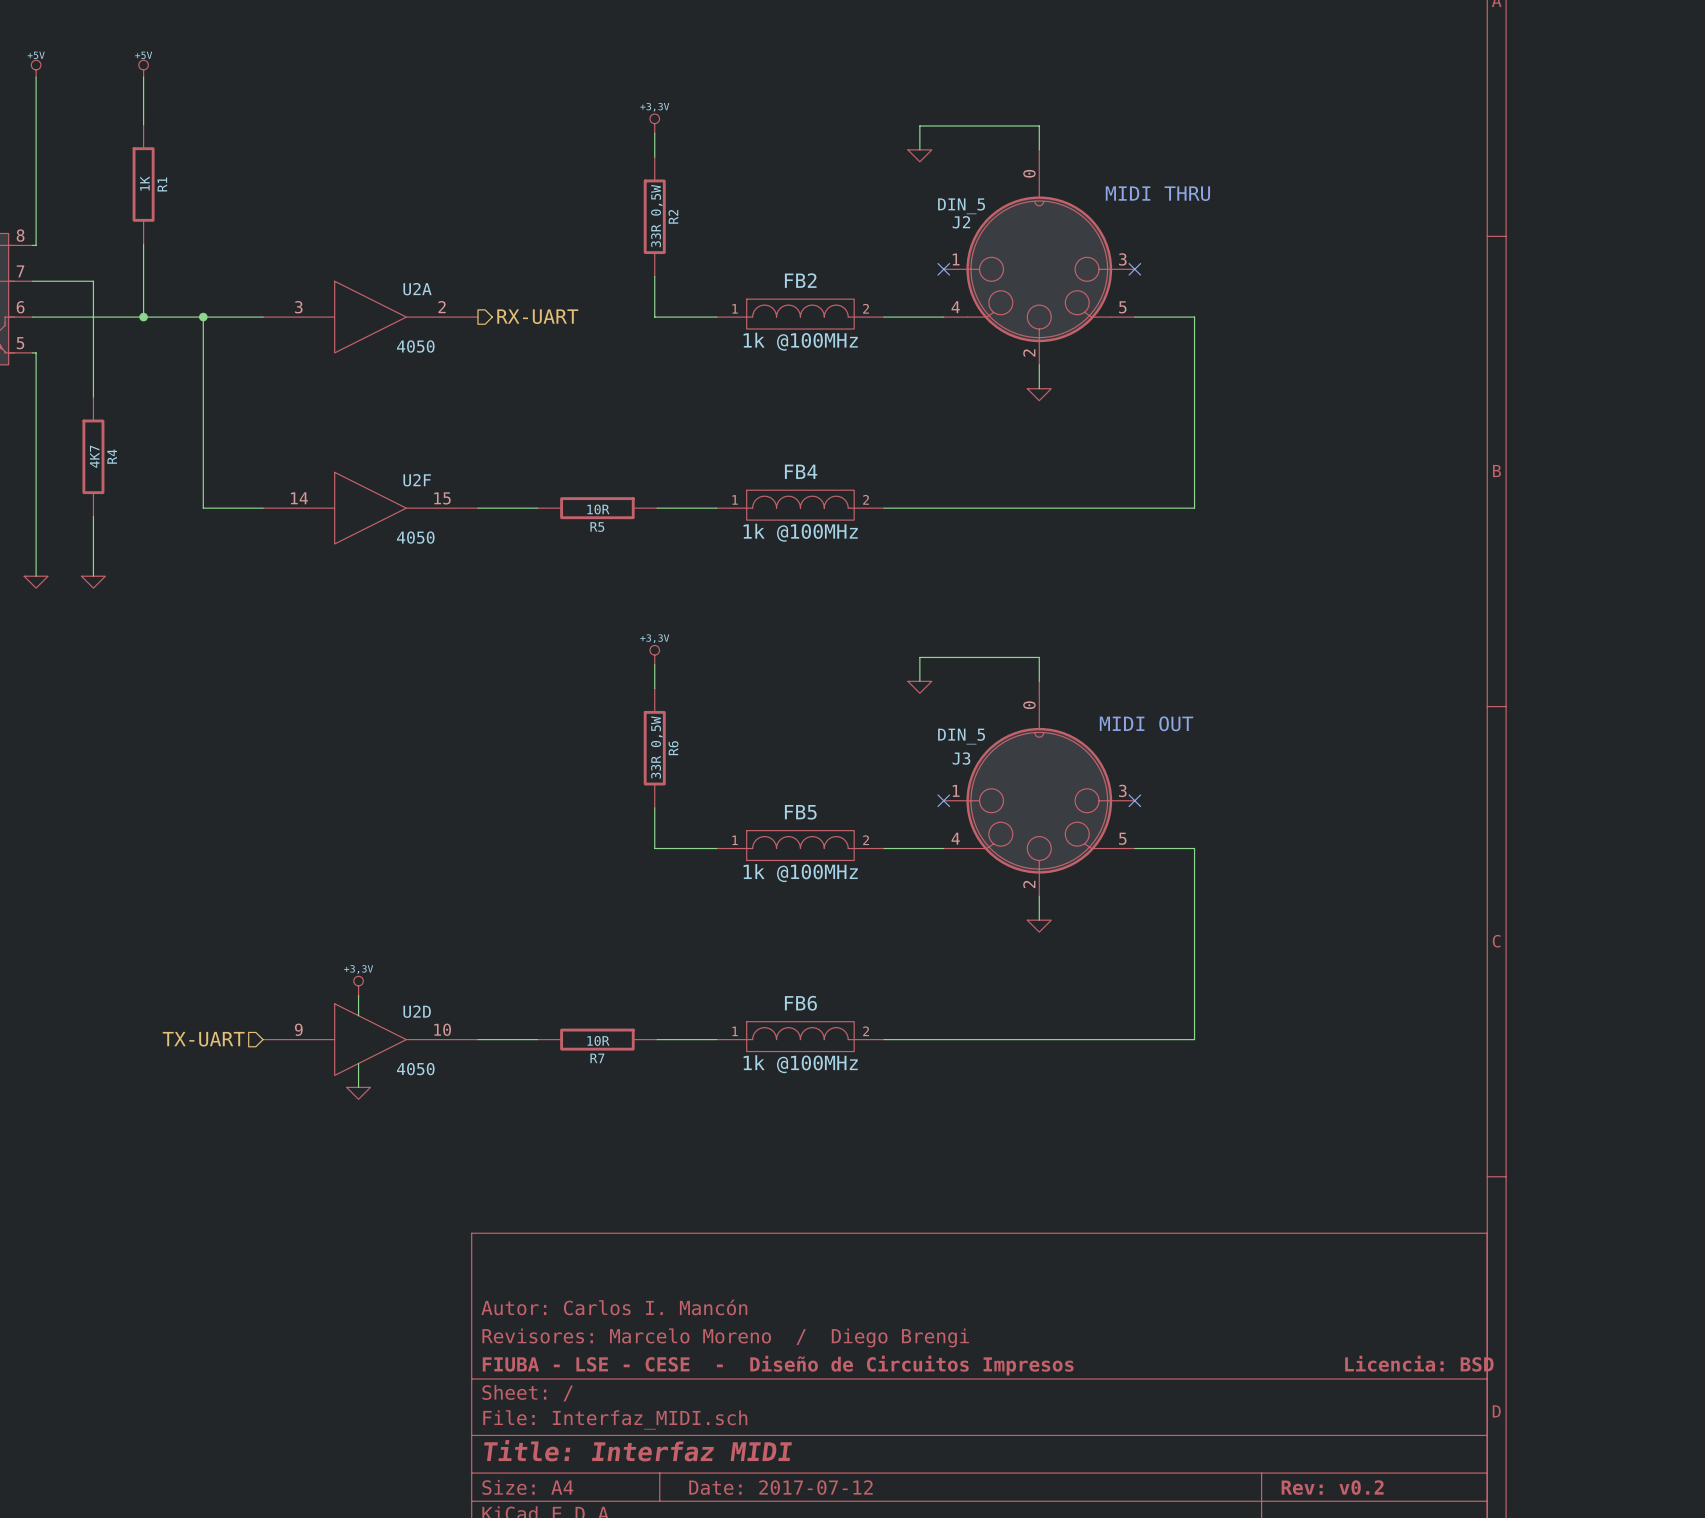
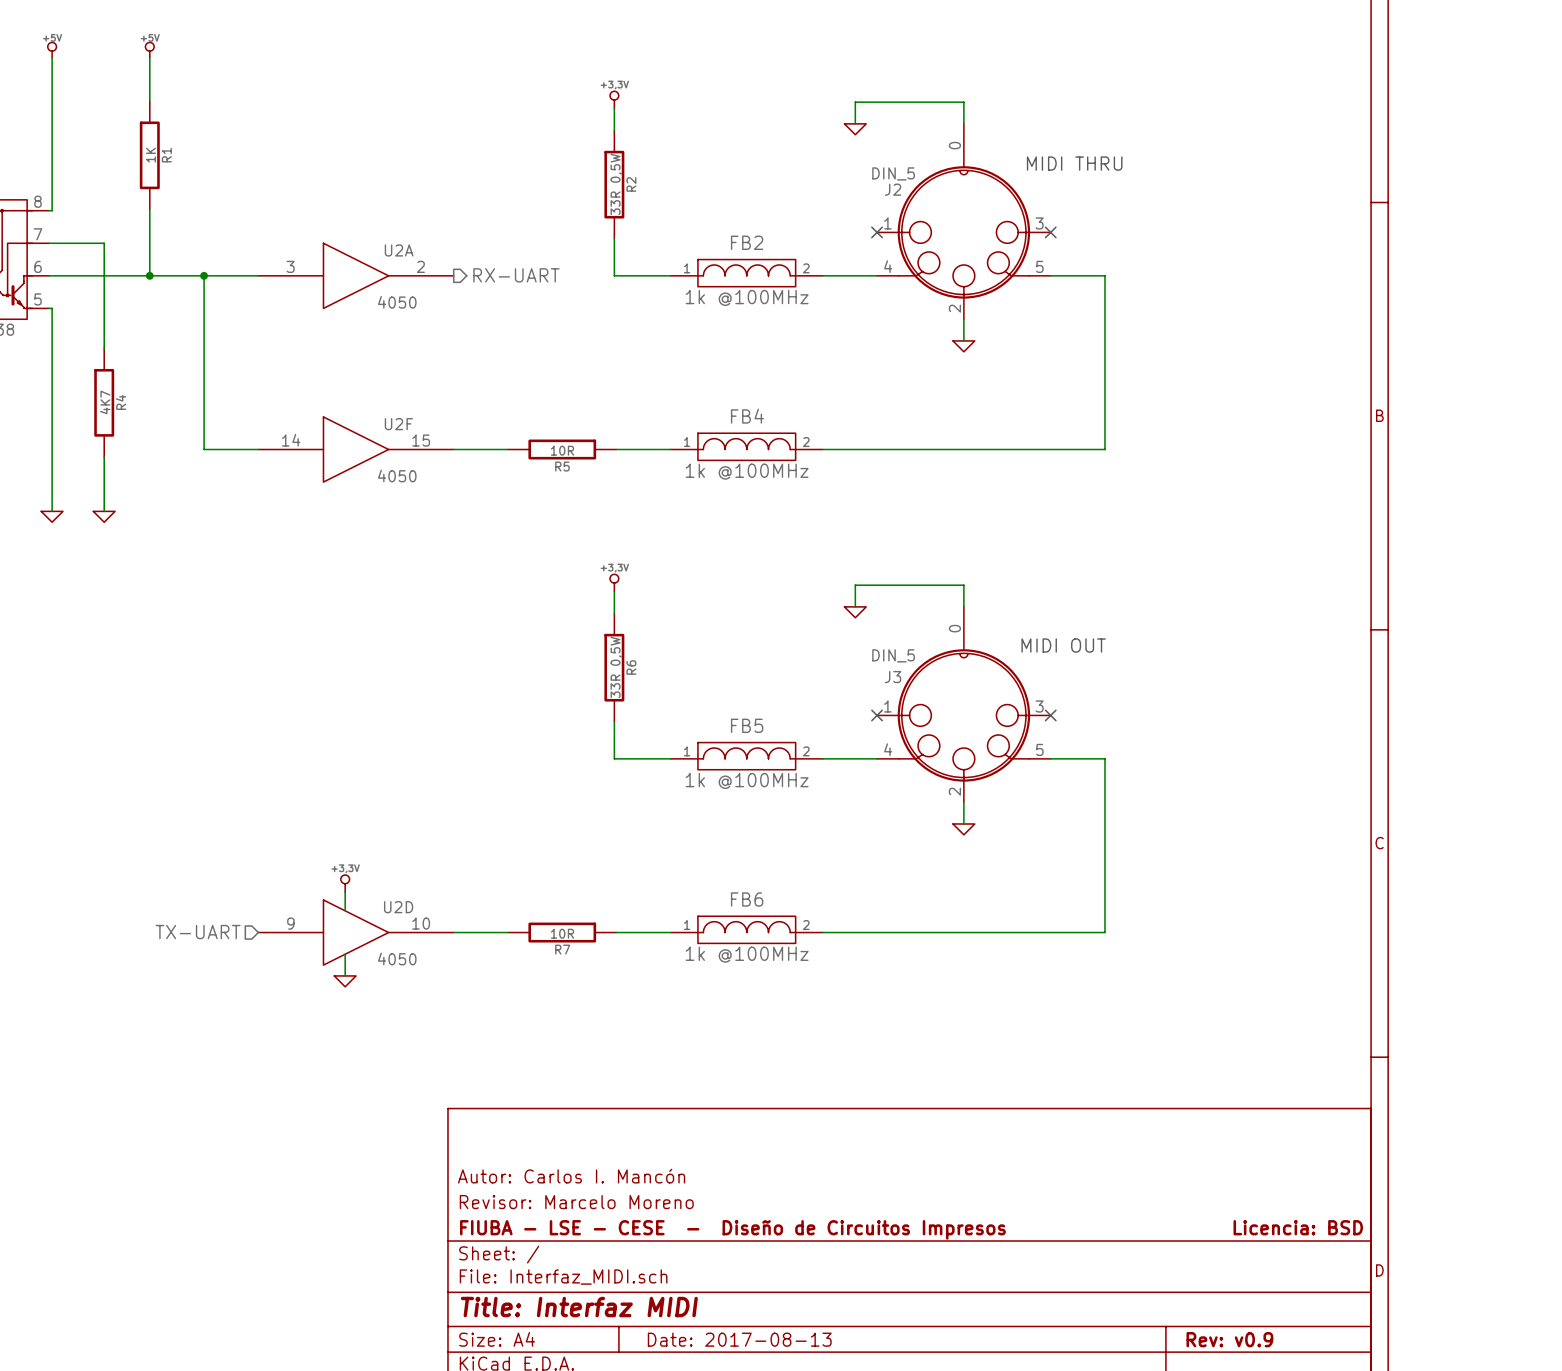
title block: Revisores: Marcelo Moreno / Diego Brengi (725, 1337) -> Revisor: Marcelo Moreno (576, 1202)
title block: Date: 2017-07-12 (780, 1487) -> Date: 2017-08-13 (739, 1339)
title block: Rev: v0.2 (1332, 1487) -> Rev: v0.9 (1229, 1339)

